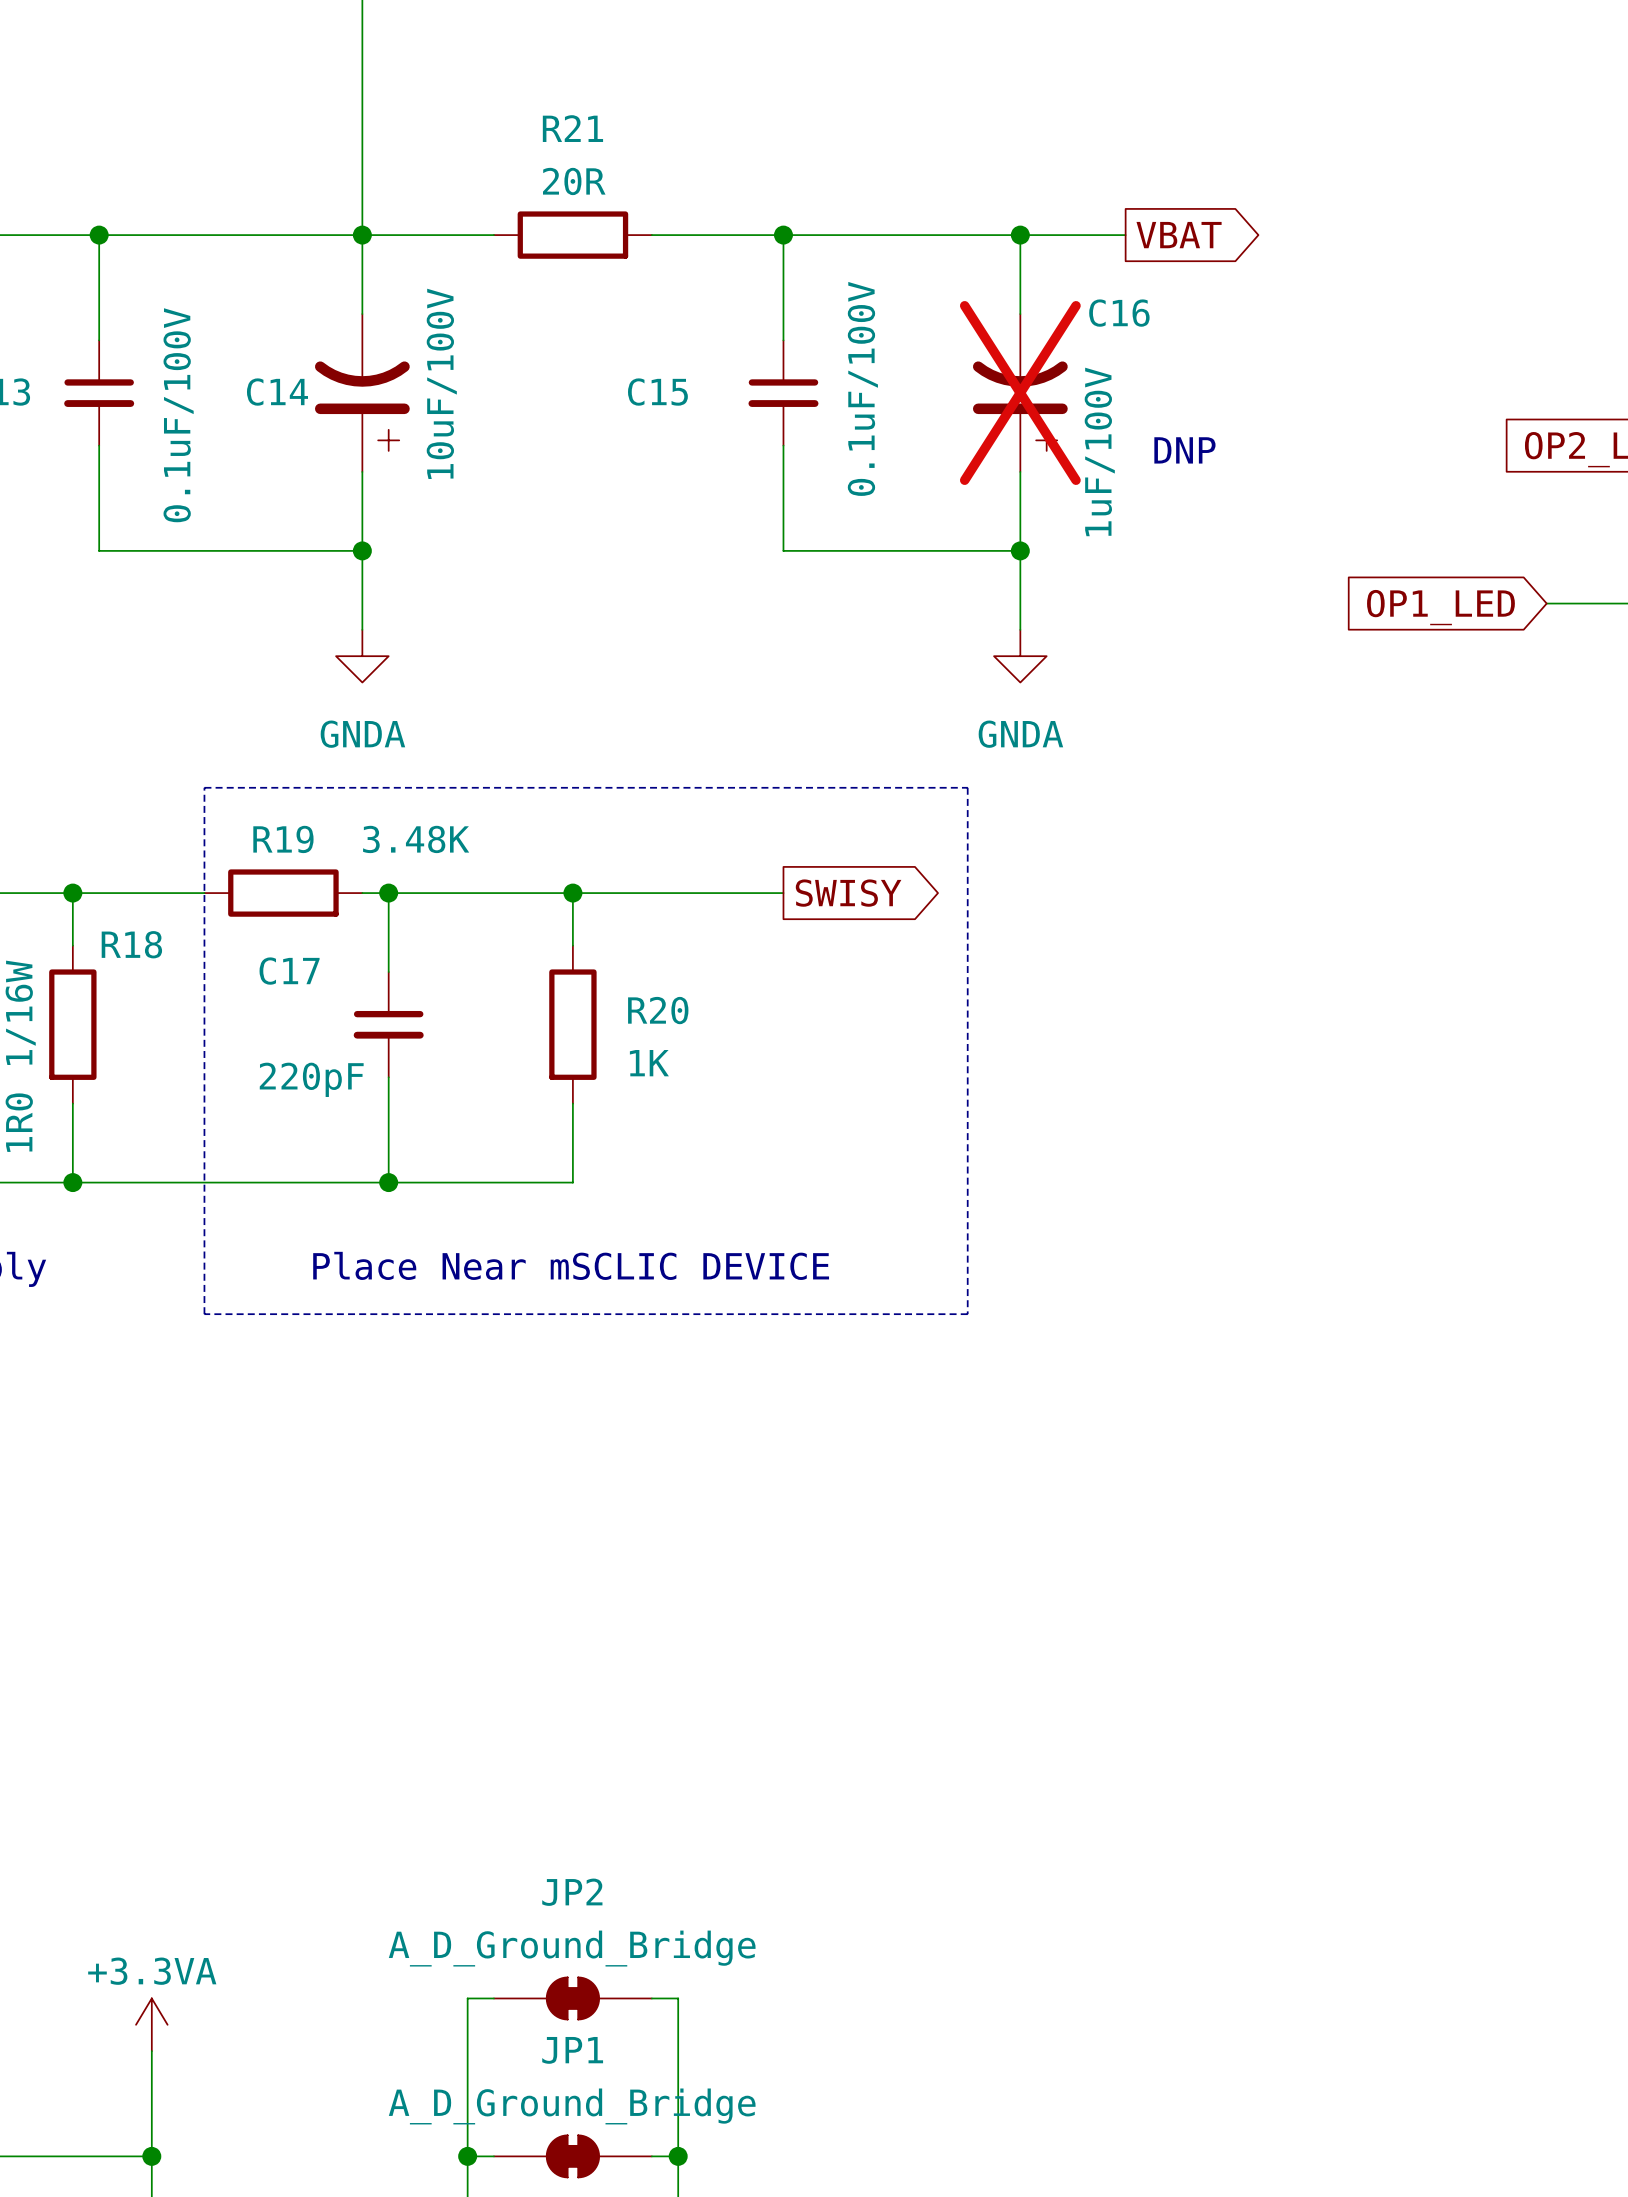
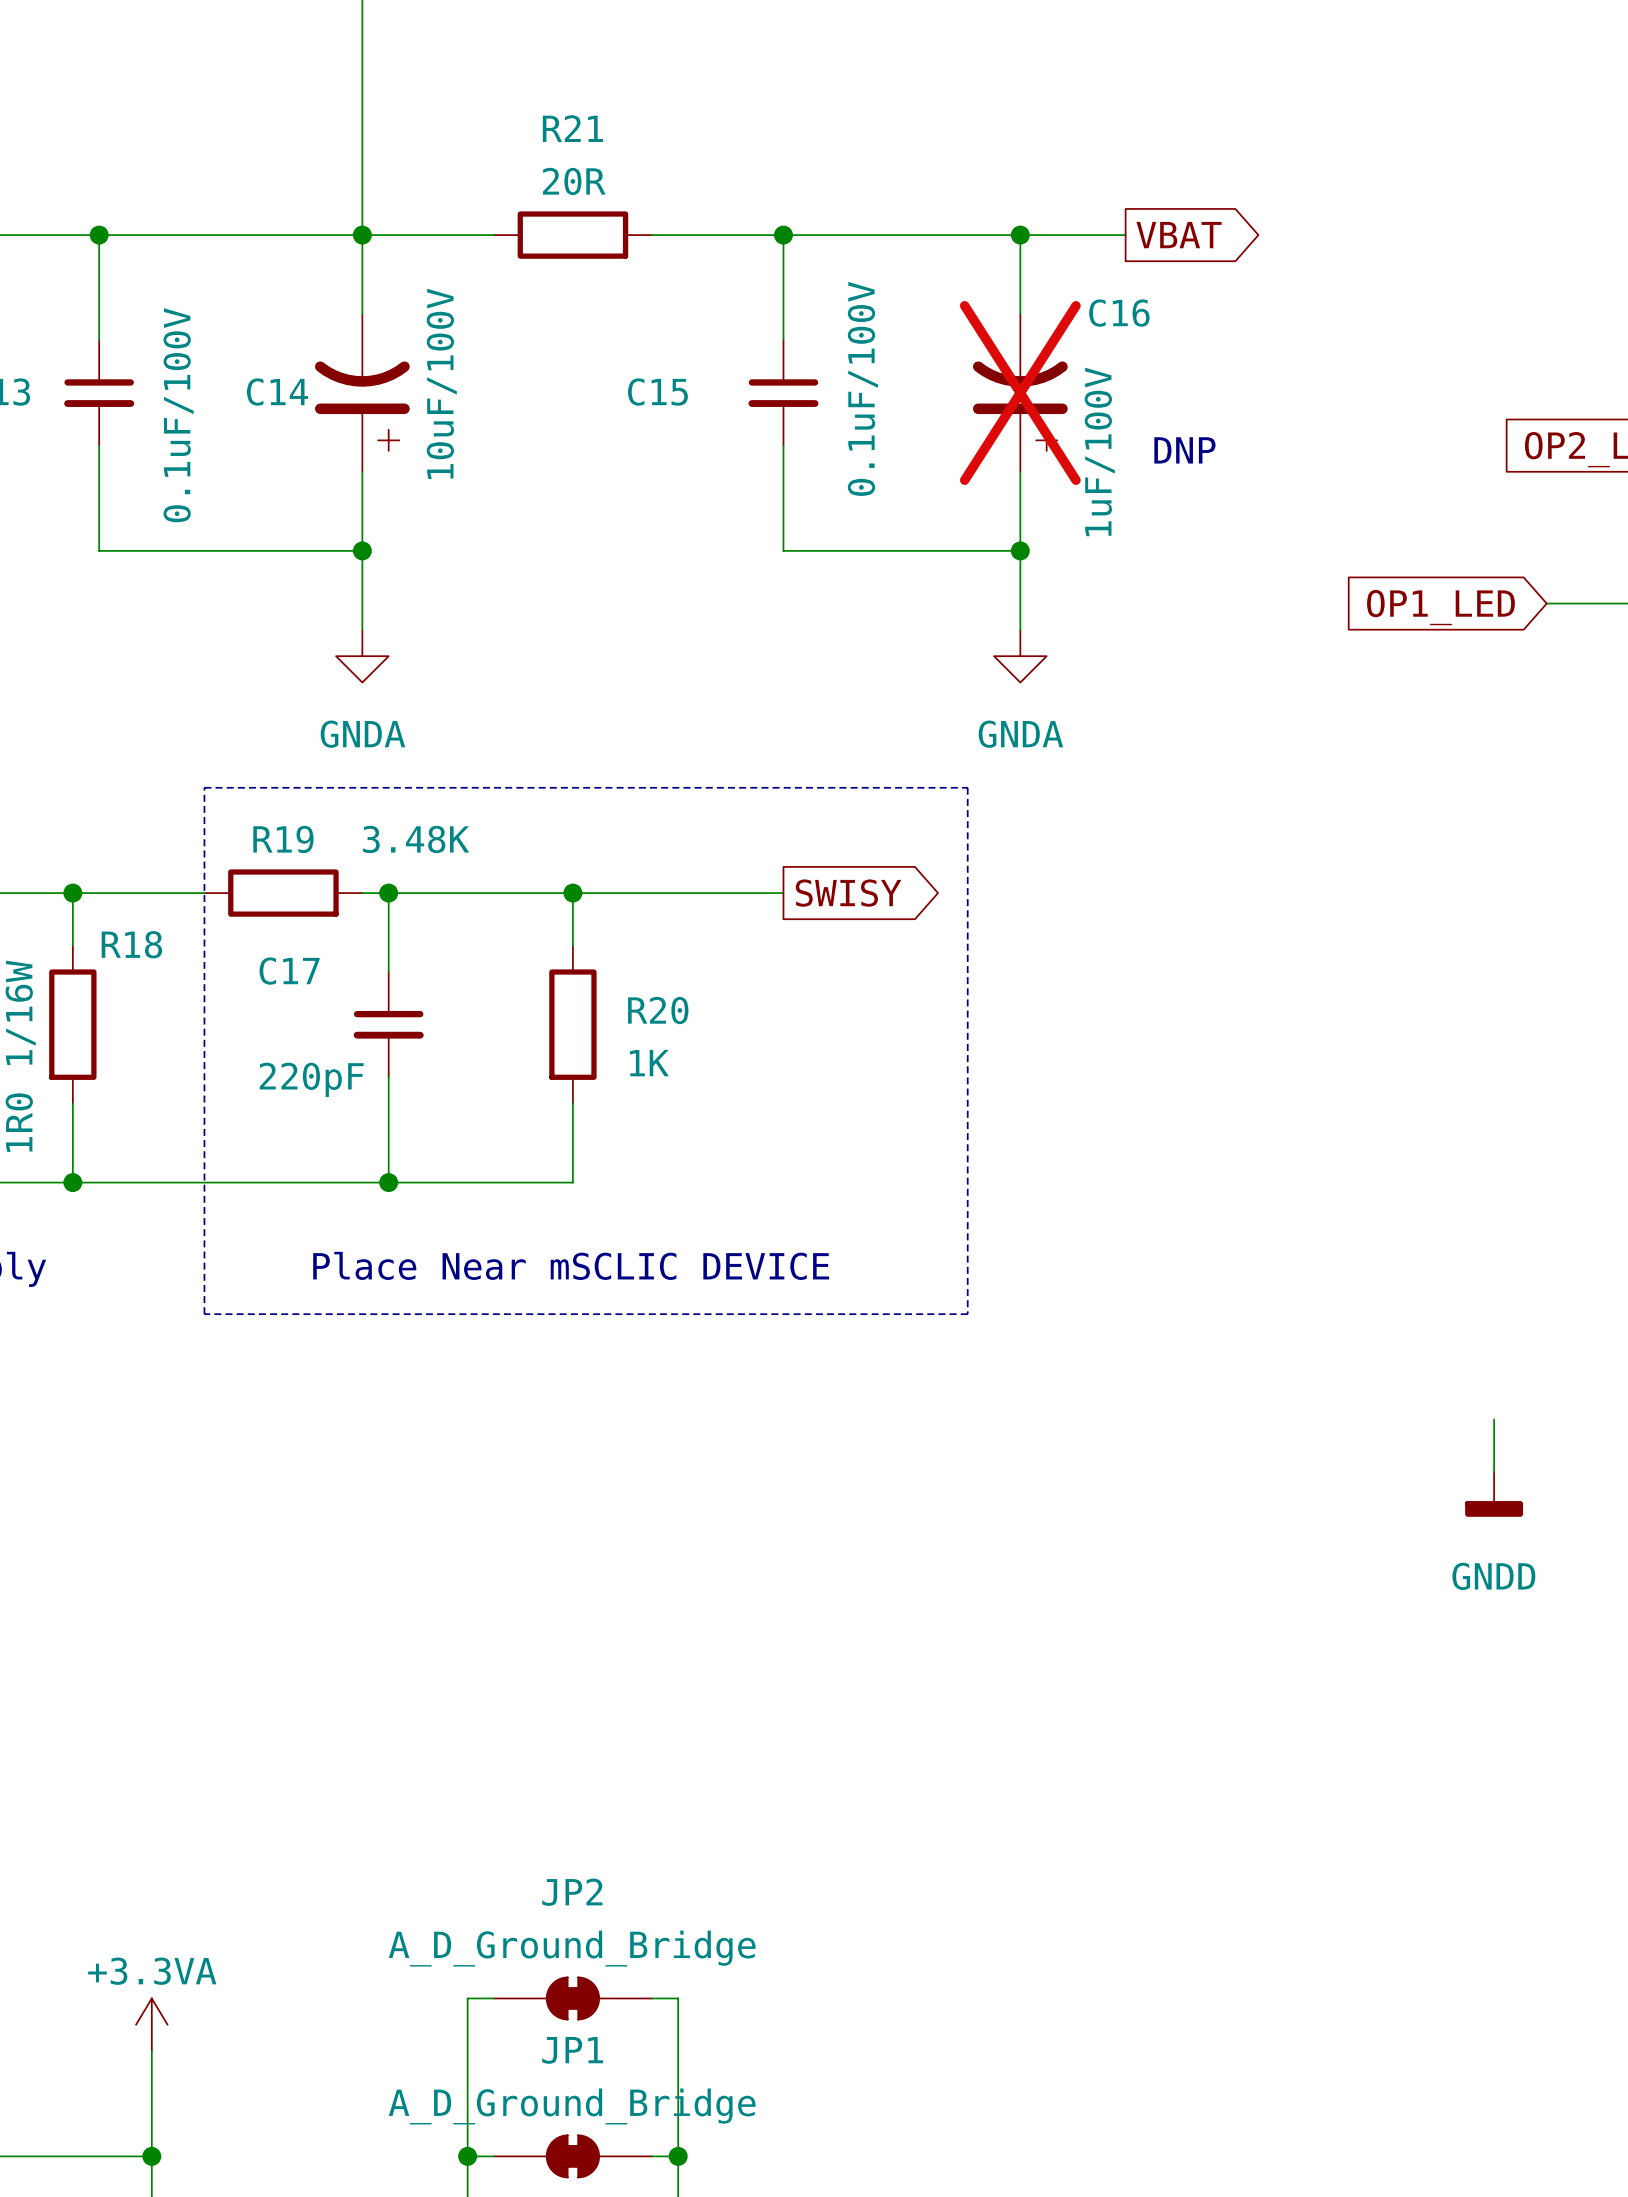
wire: none -> (1494, 1419) (1494, 1472)
power symbol: none -> GNDD (1494, 1494)

